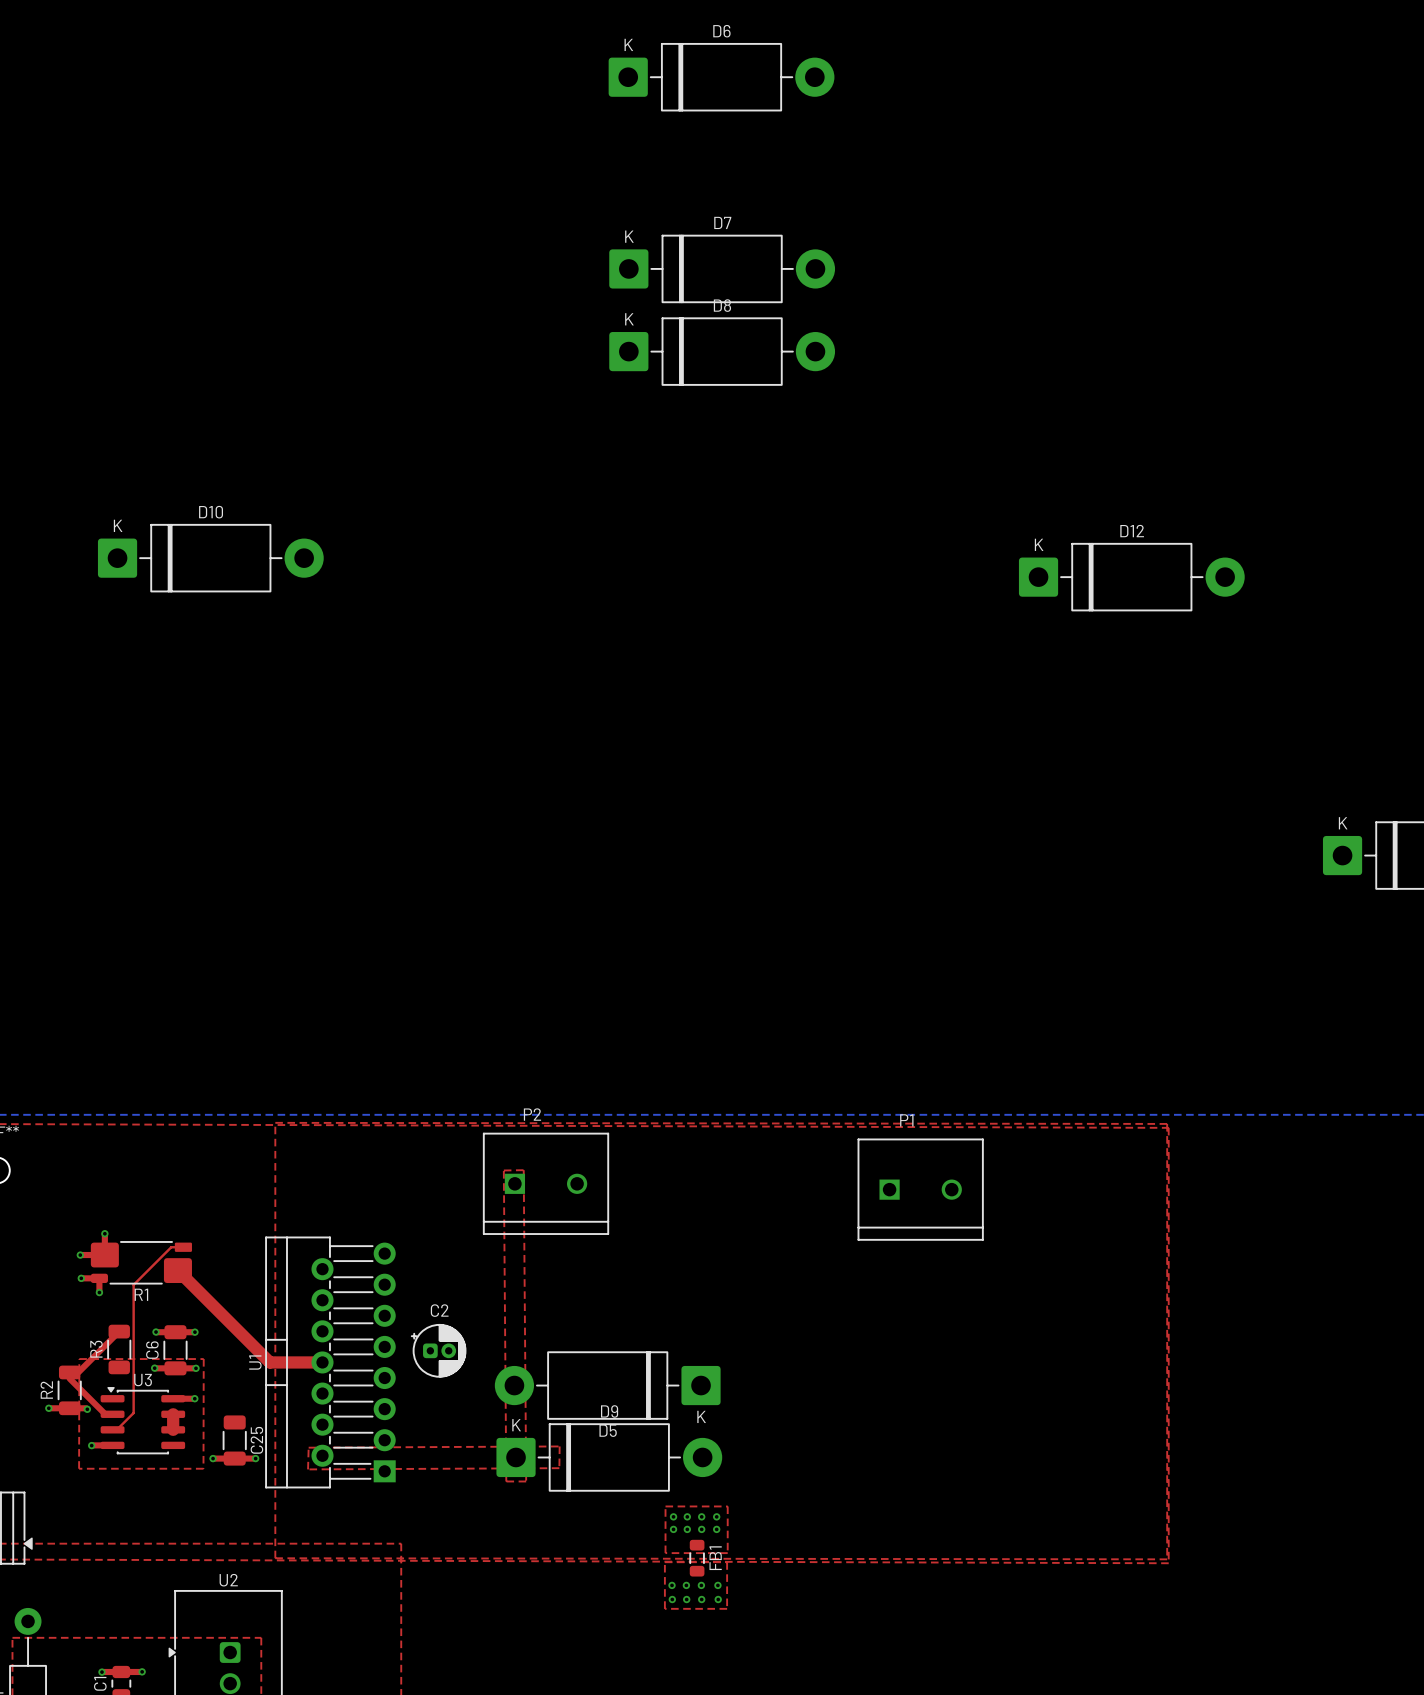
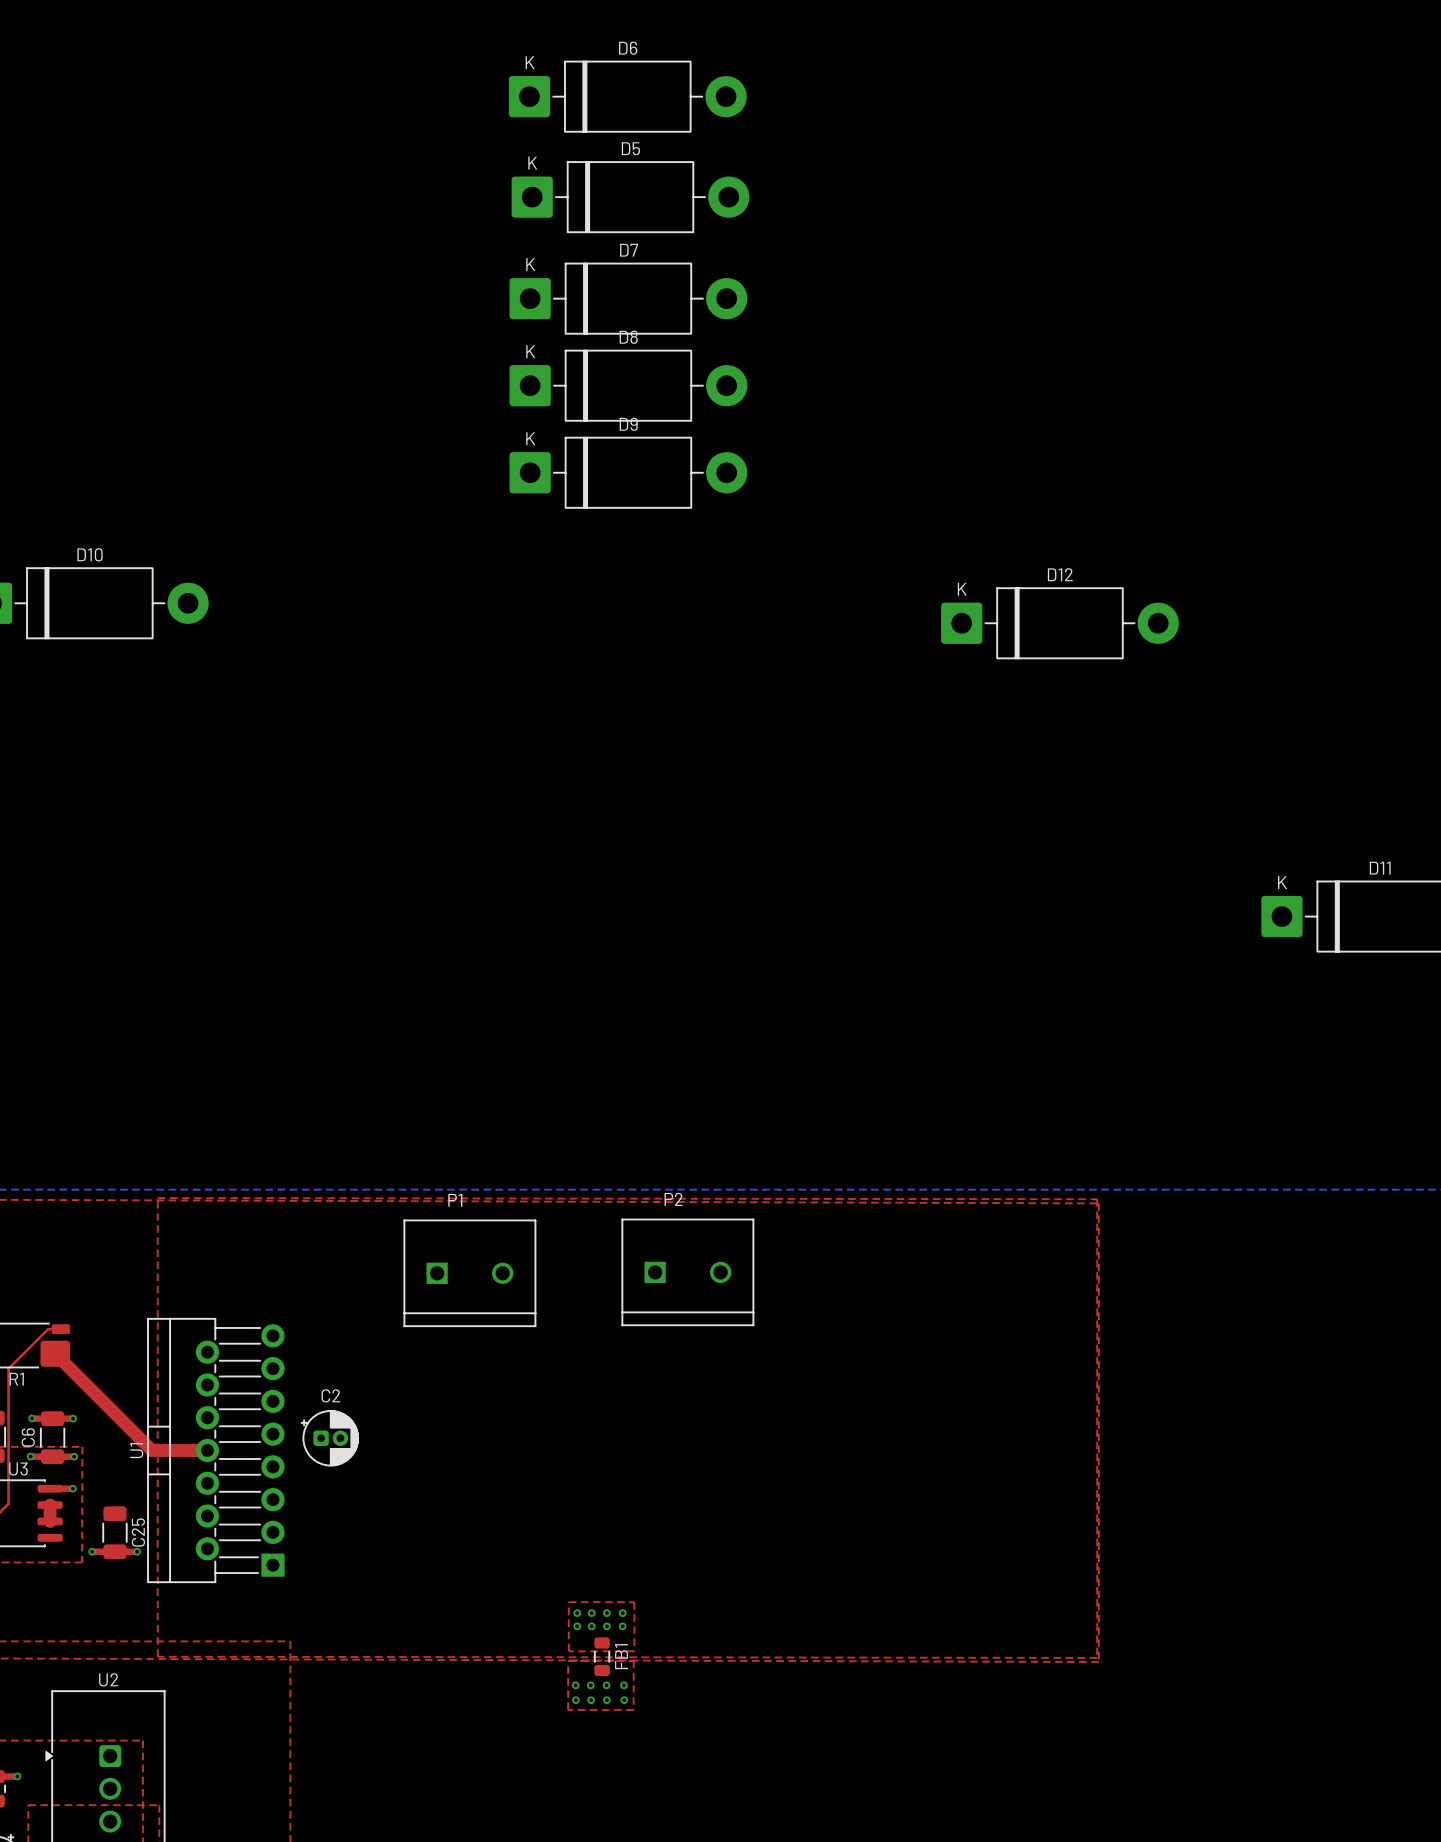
top zone outline: (523, 1170) (503, 1170) (506, 1481) (526, 1481) (523, 1170) -> none
P2 position: (546, 1183) -> (687, 1272)
P1 position: (920, 1189) -> (469, 1273)
D5 rotation: 0° (607, 1385) -> 180° (630, 197)
D5 position: (607, 1385) -> (630, 197)
top zone outline: (559, 1446) (308, 1447) (308, 1469) (559, 1468) (559, 1446) -> none
D9 position: (609, 1457) -> (628, 472)

